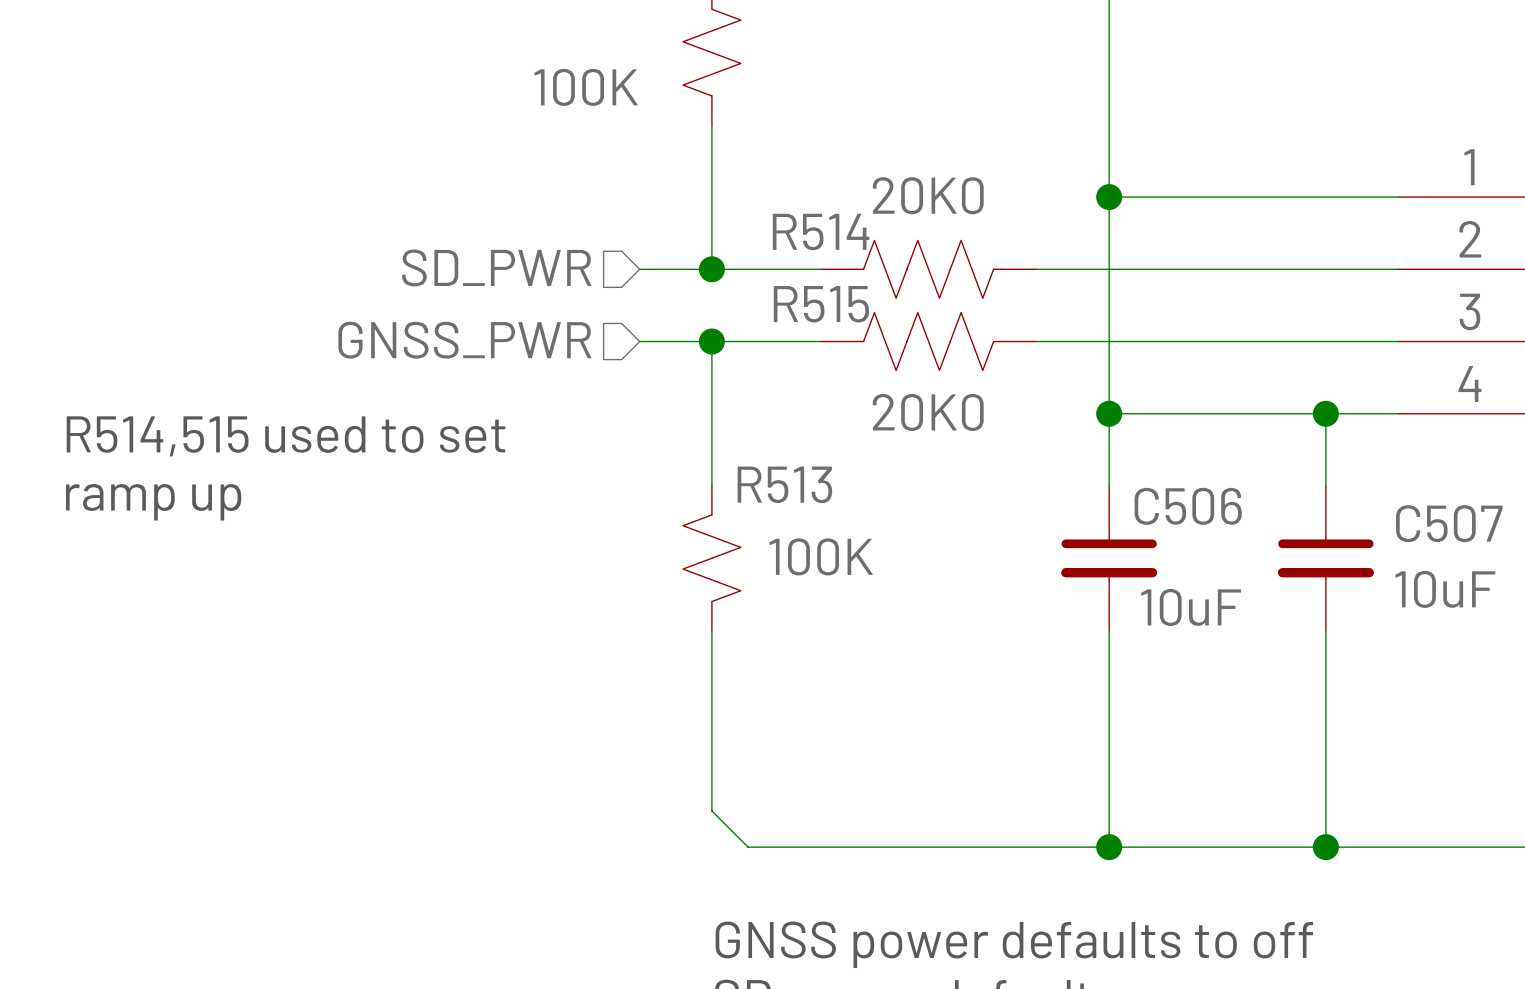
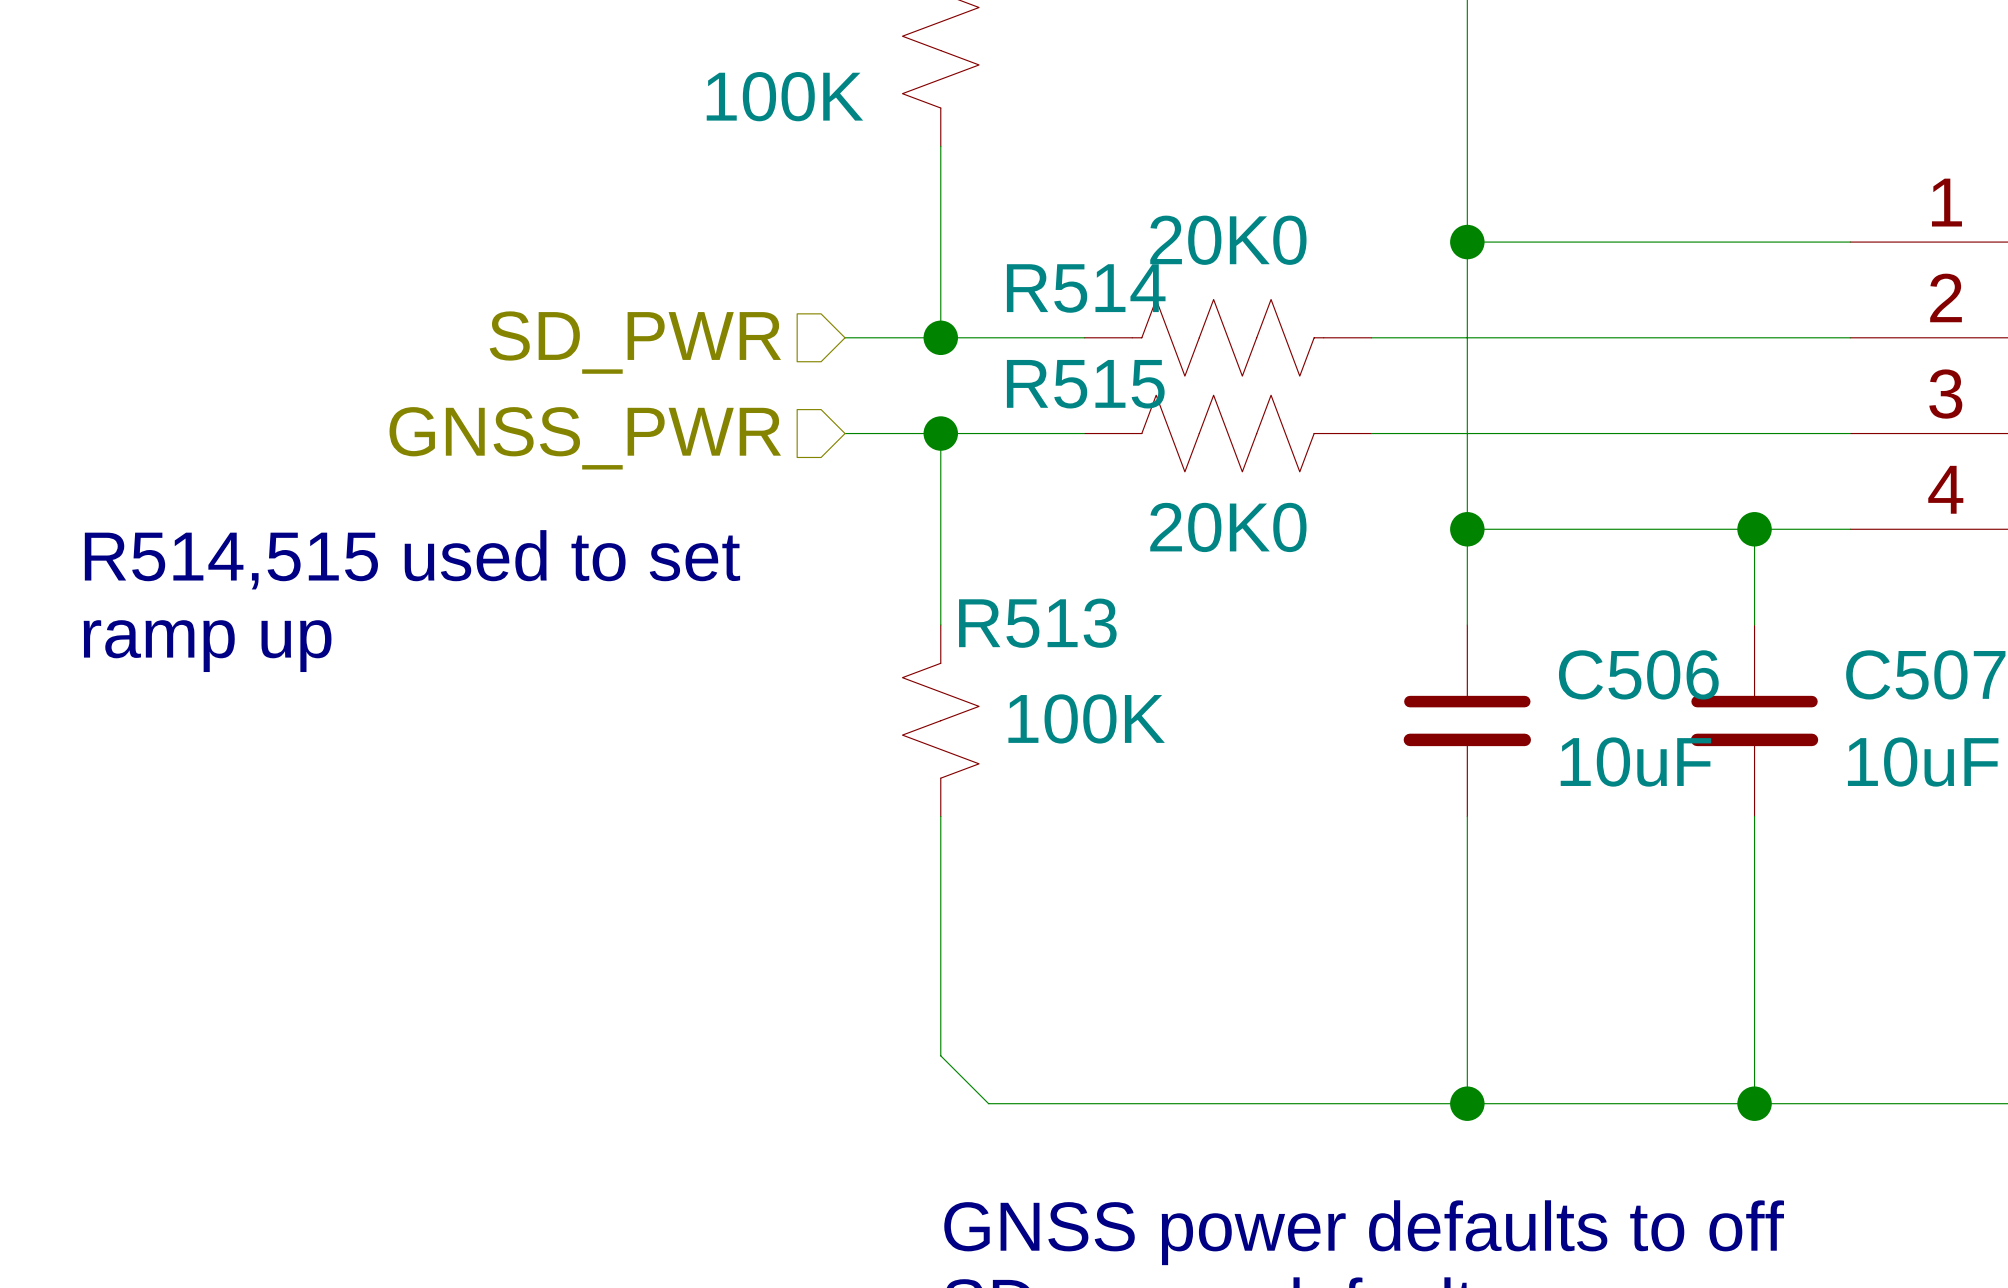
C506 name position: C506 (1188, 506) -> C506 (1638, 674)
C506 value position: 10uF (1191, 607) -> 10uF (1635, 762)

